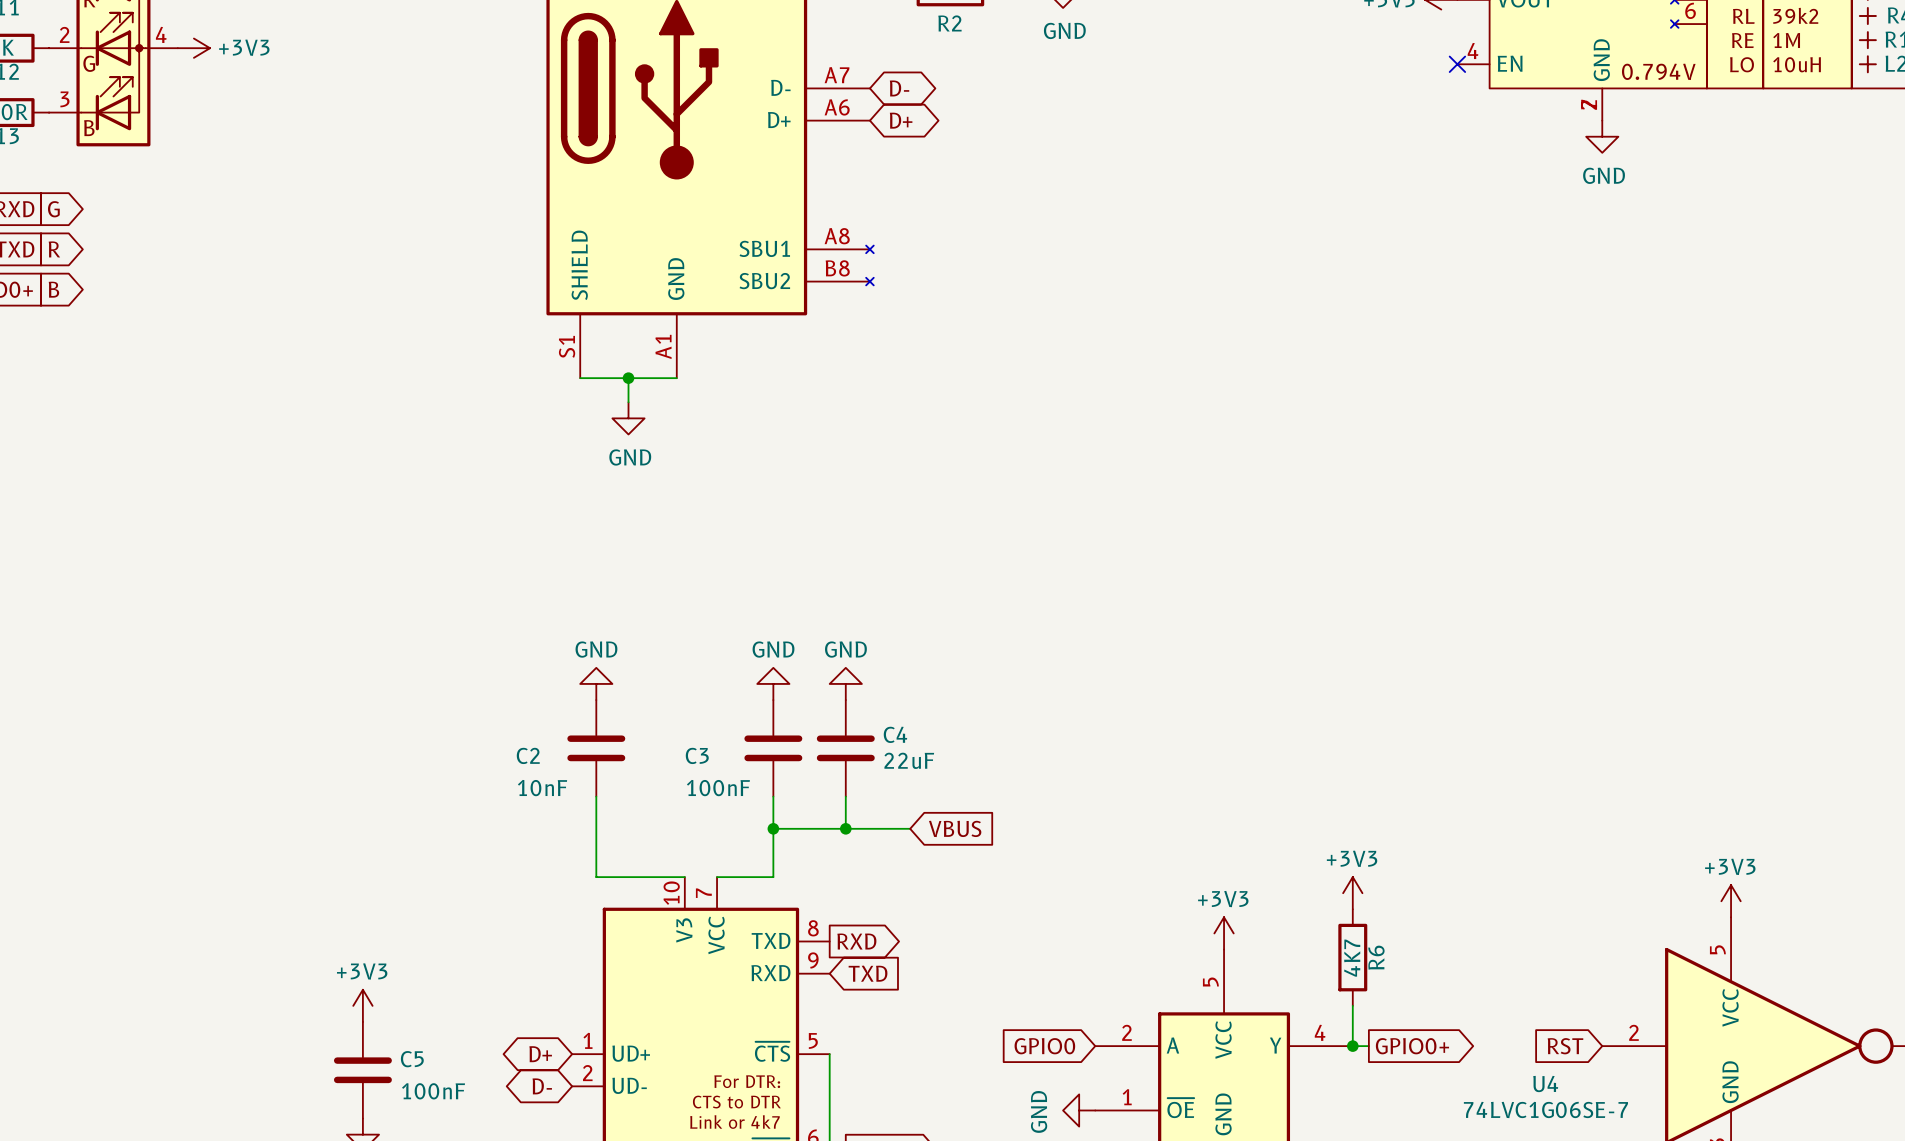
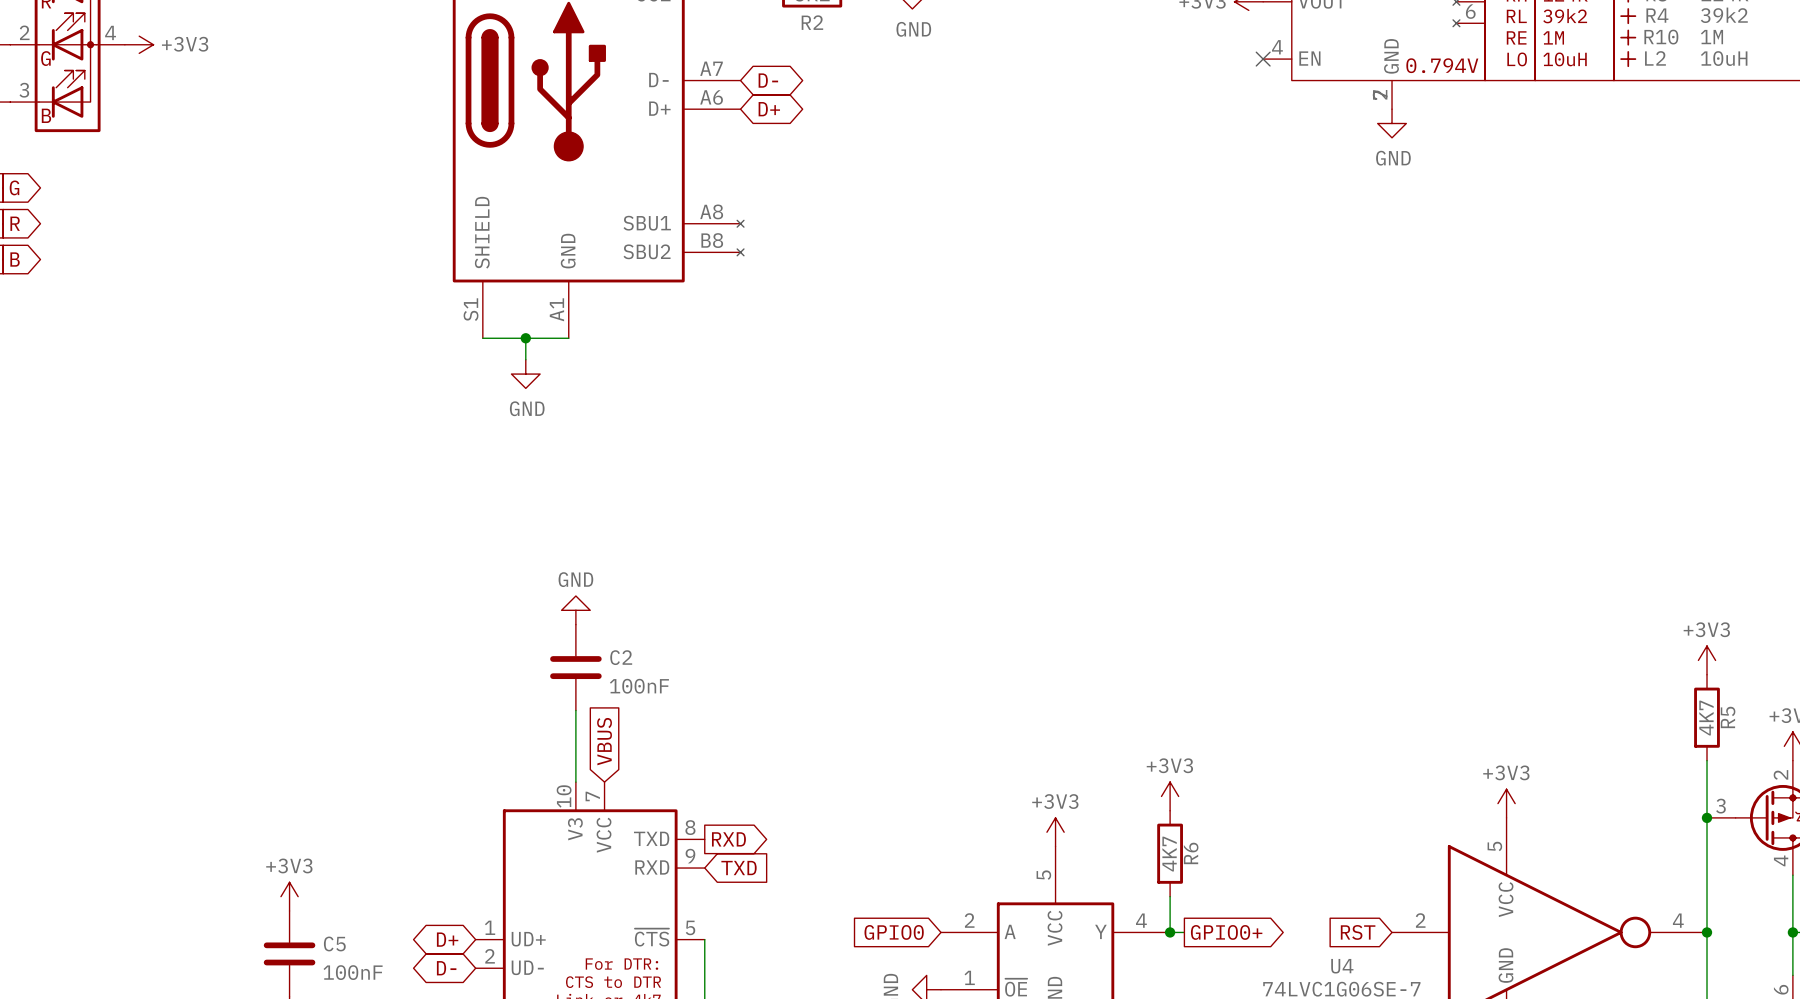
power symbol: GND (596, 683) -> none
power symbol: none -> GND (575, 610)
power symbol: GND (773, 683) -> none
power symbol: GND (845, 683) -> none
C2 position: (596, 748) -> (575, 667)
C3: 100nF (773, 748) -> none
C4: 22uF (845, 748) -> none
C2 name position: C2 (528, 755) -> C2 (621, 657)
C2 value: 10nF (542, 788) -> 100nF (639, 686)
wire: (596, 796) (596, 877) (684, 877) -> (575, 710) (575, 782)
wire: (773, 796) (773, 877) (717, 877) -> none
wire: (845, 796) (845, 828) -> none
wire: (773, 828) (910, 828) -> none
junction: (773, 828) -> none
junction: (845, 828) -> none
global label rotation: 0° (955, 828) -> 90° counterclockwise (604, 741)
global label position: VBUS (955, 828) -> VBUS (604, 741)

